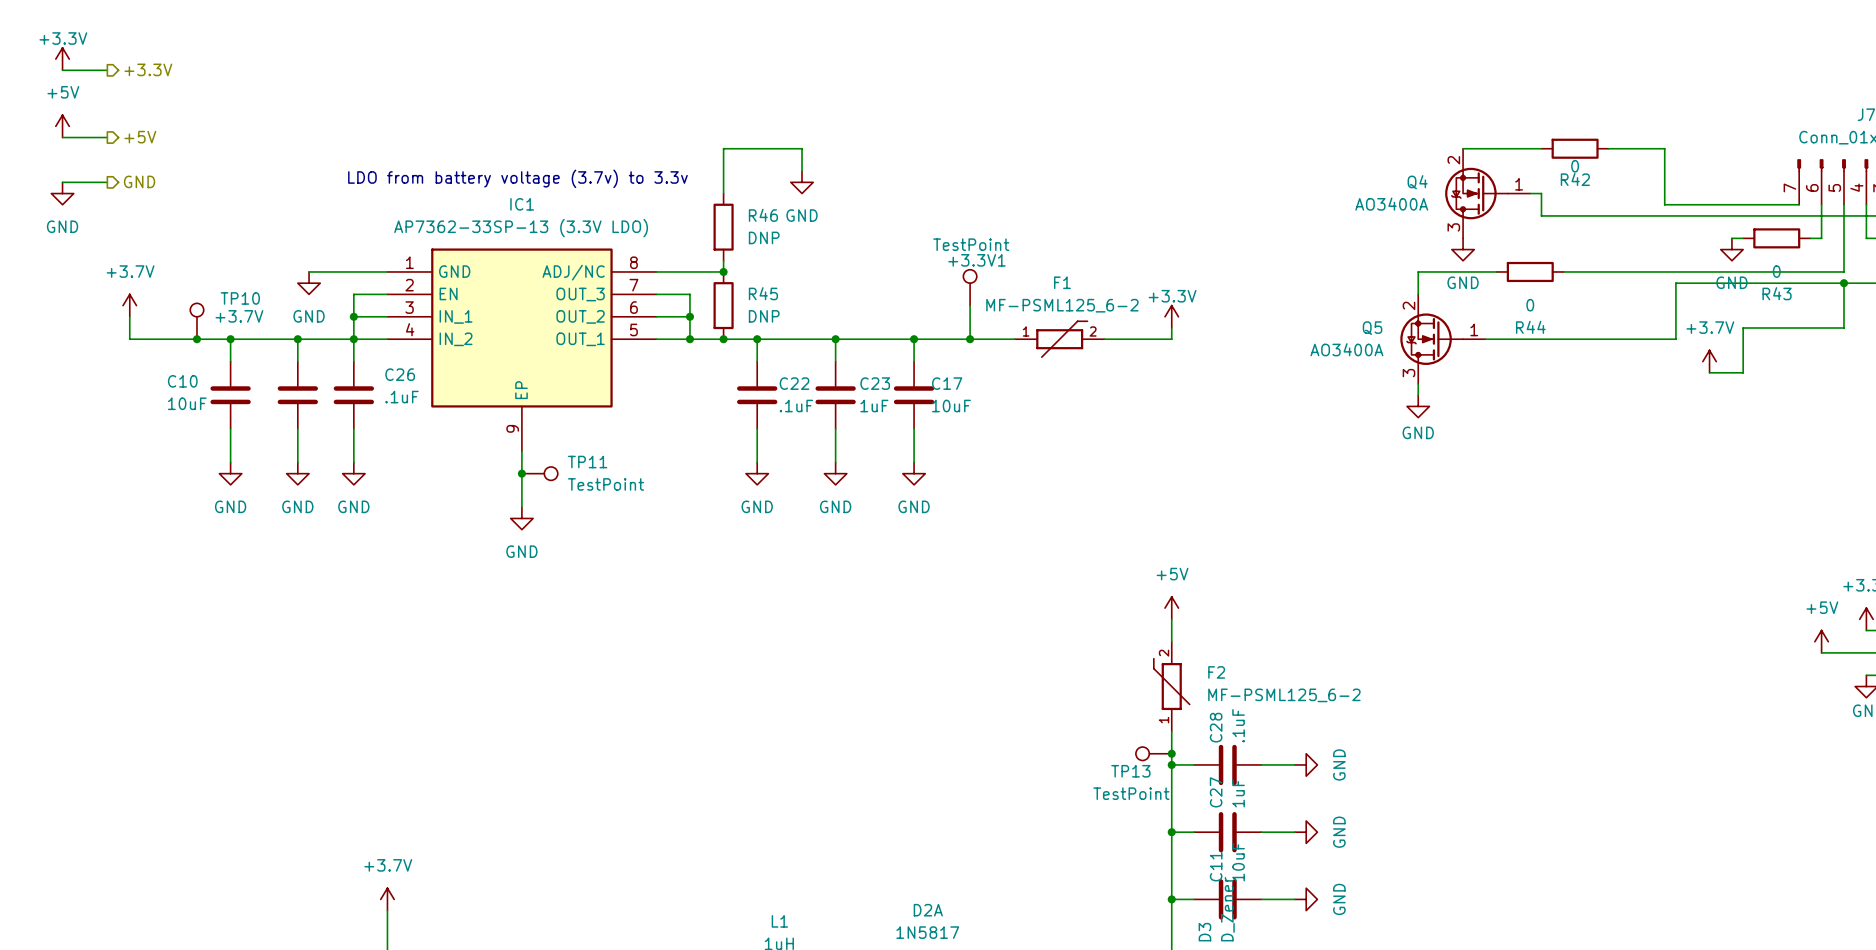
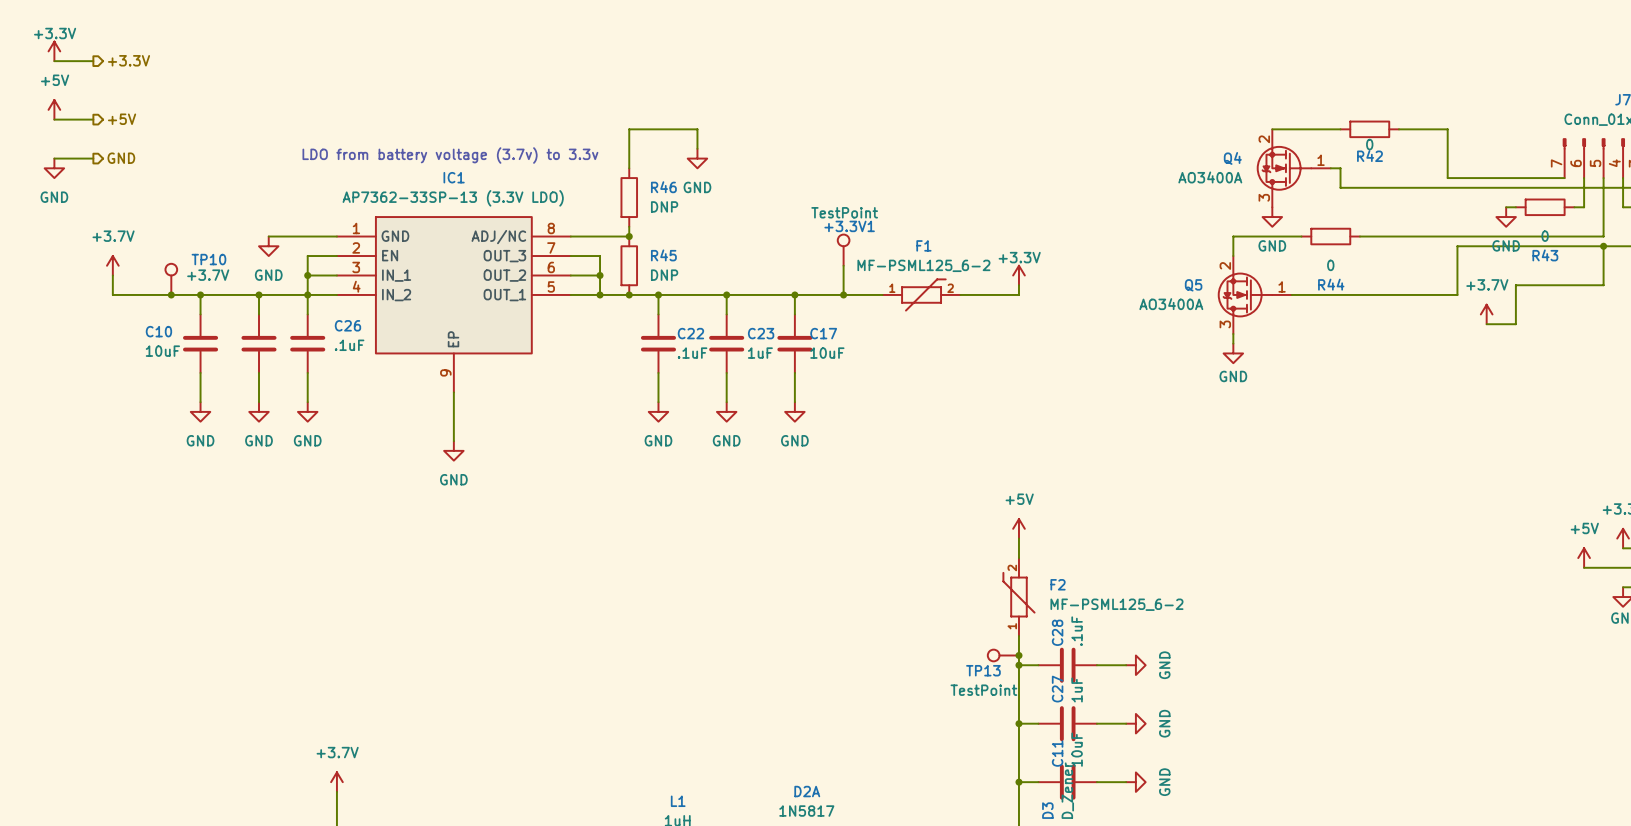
junction: (521, 473) -> none
TP11: TestPoint (539, 473) -> none

